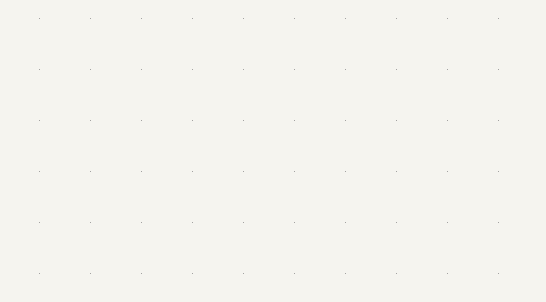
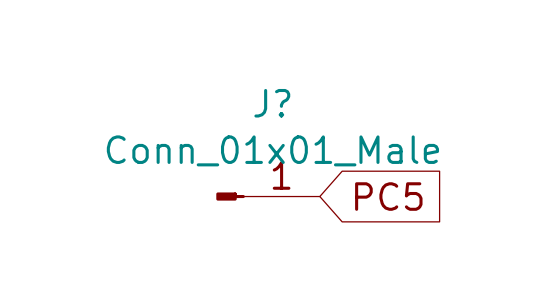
J?: none -> Conn_01x01_Male (268, 196)
global label: none -> PC5 (388, 196)

